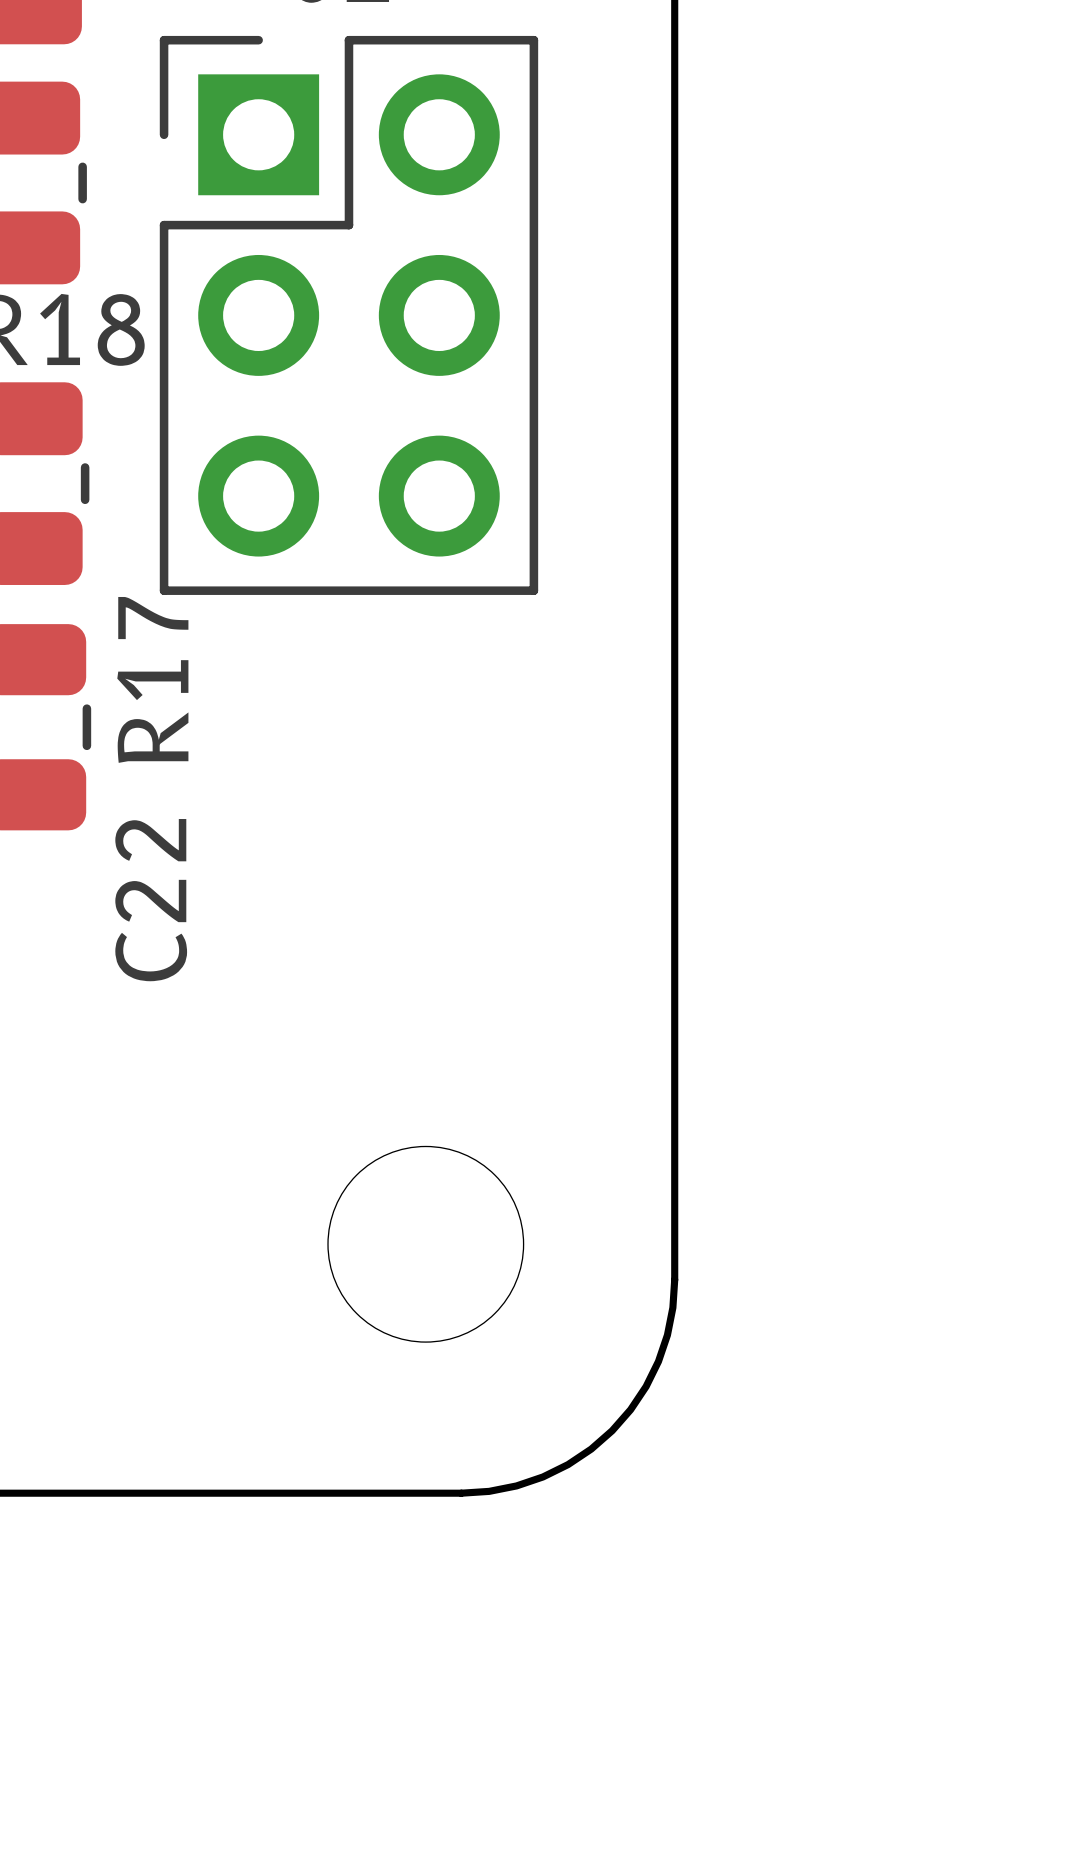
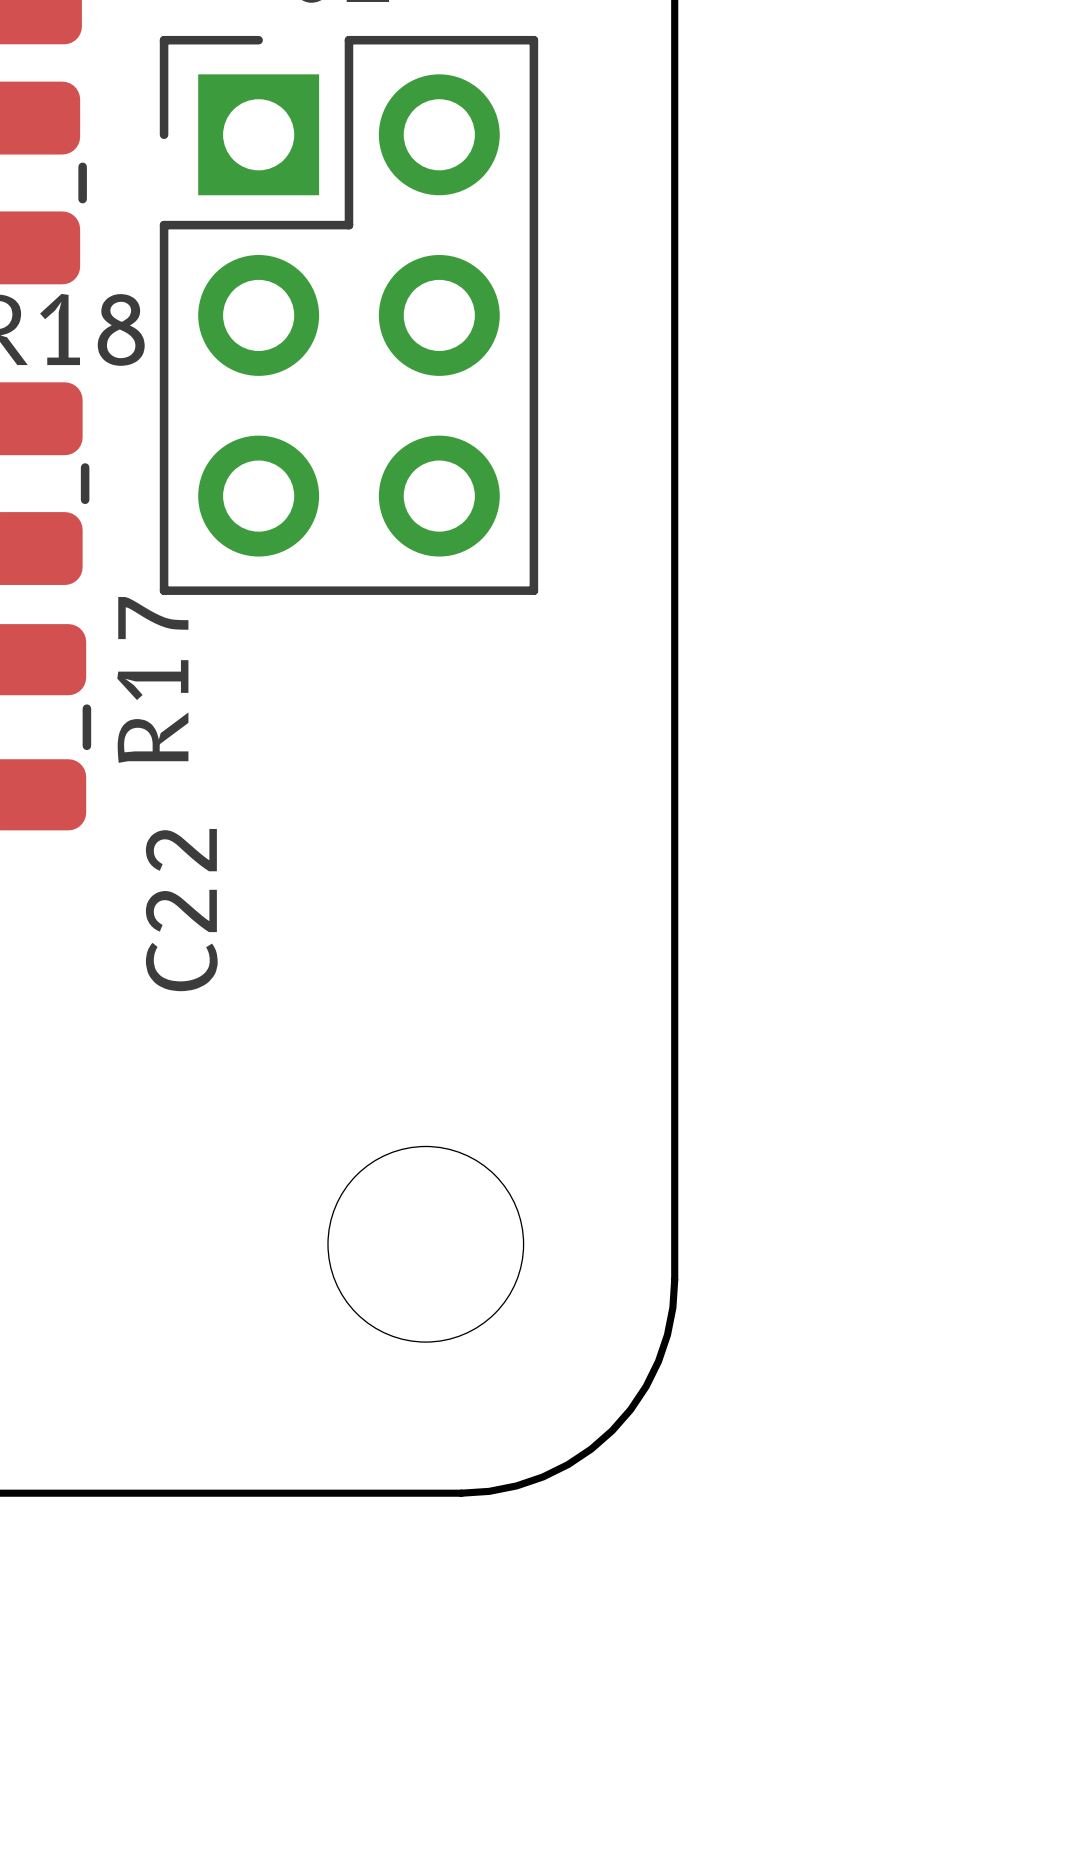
C22 name position: C22 (151, 900) -> C22 (181, 910)

